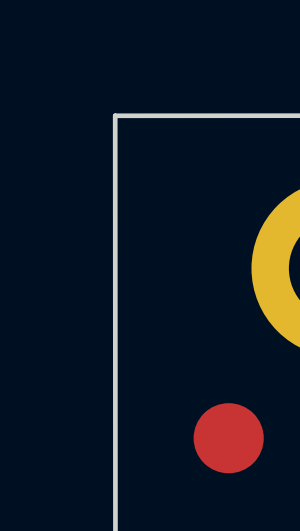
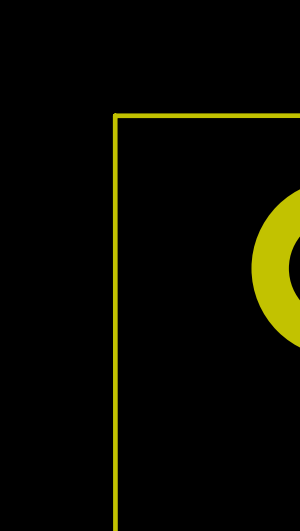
part: (228, 438) -> none

